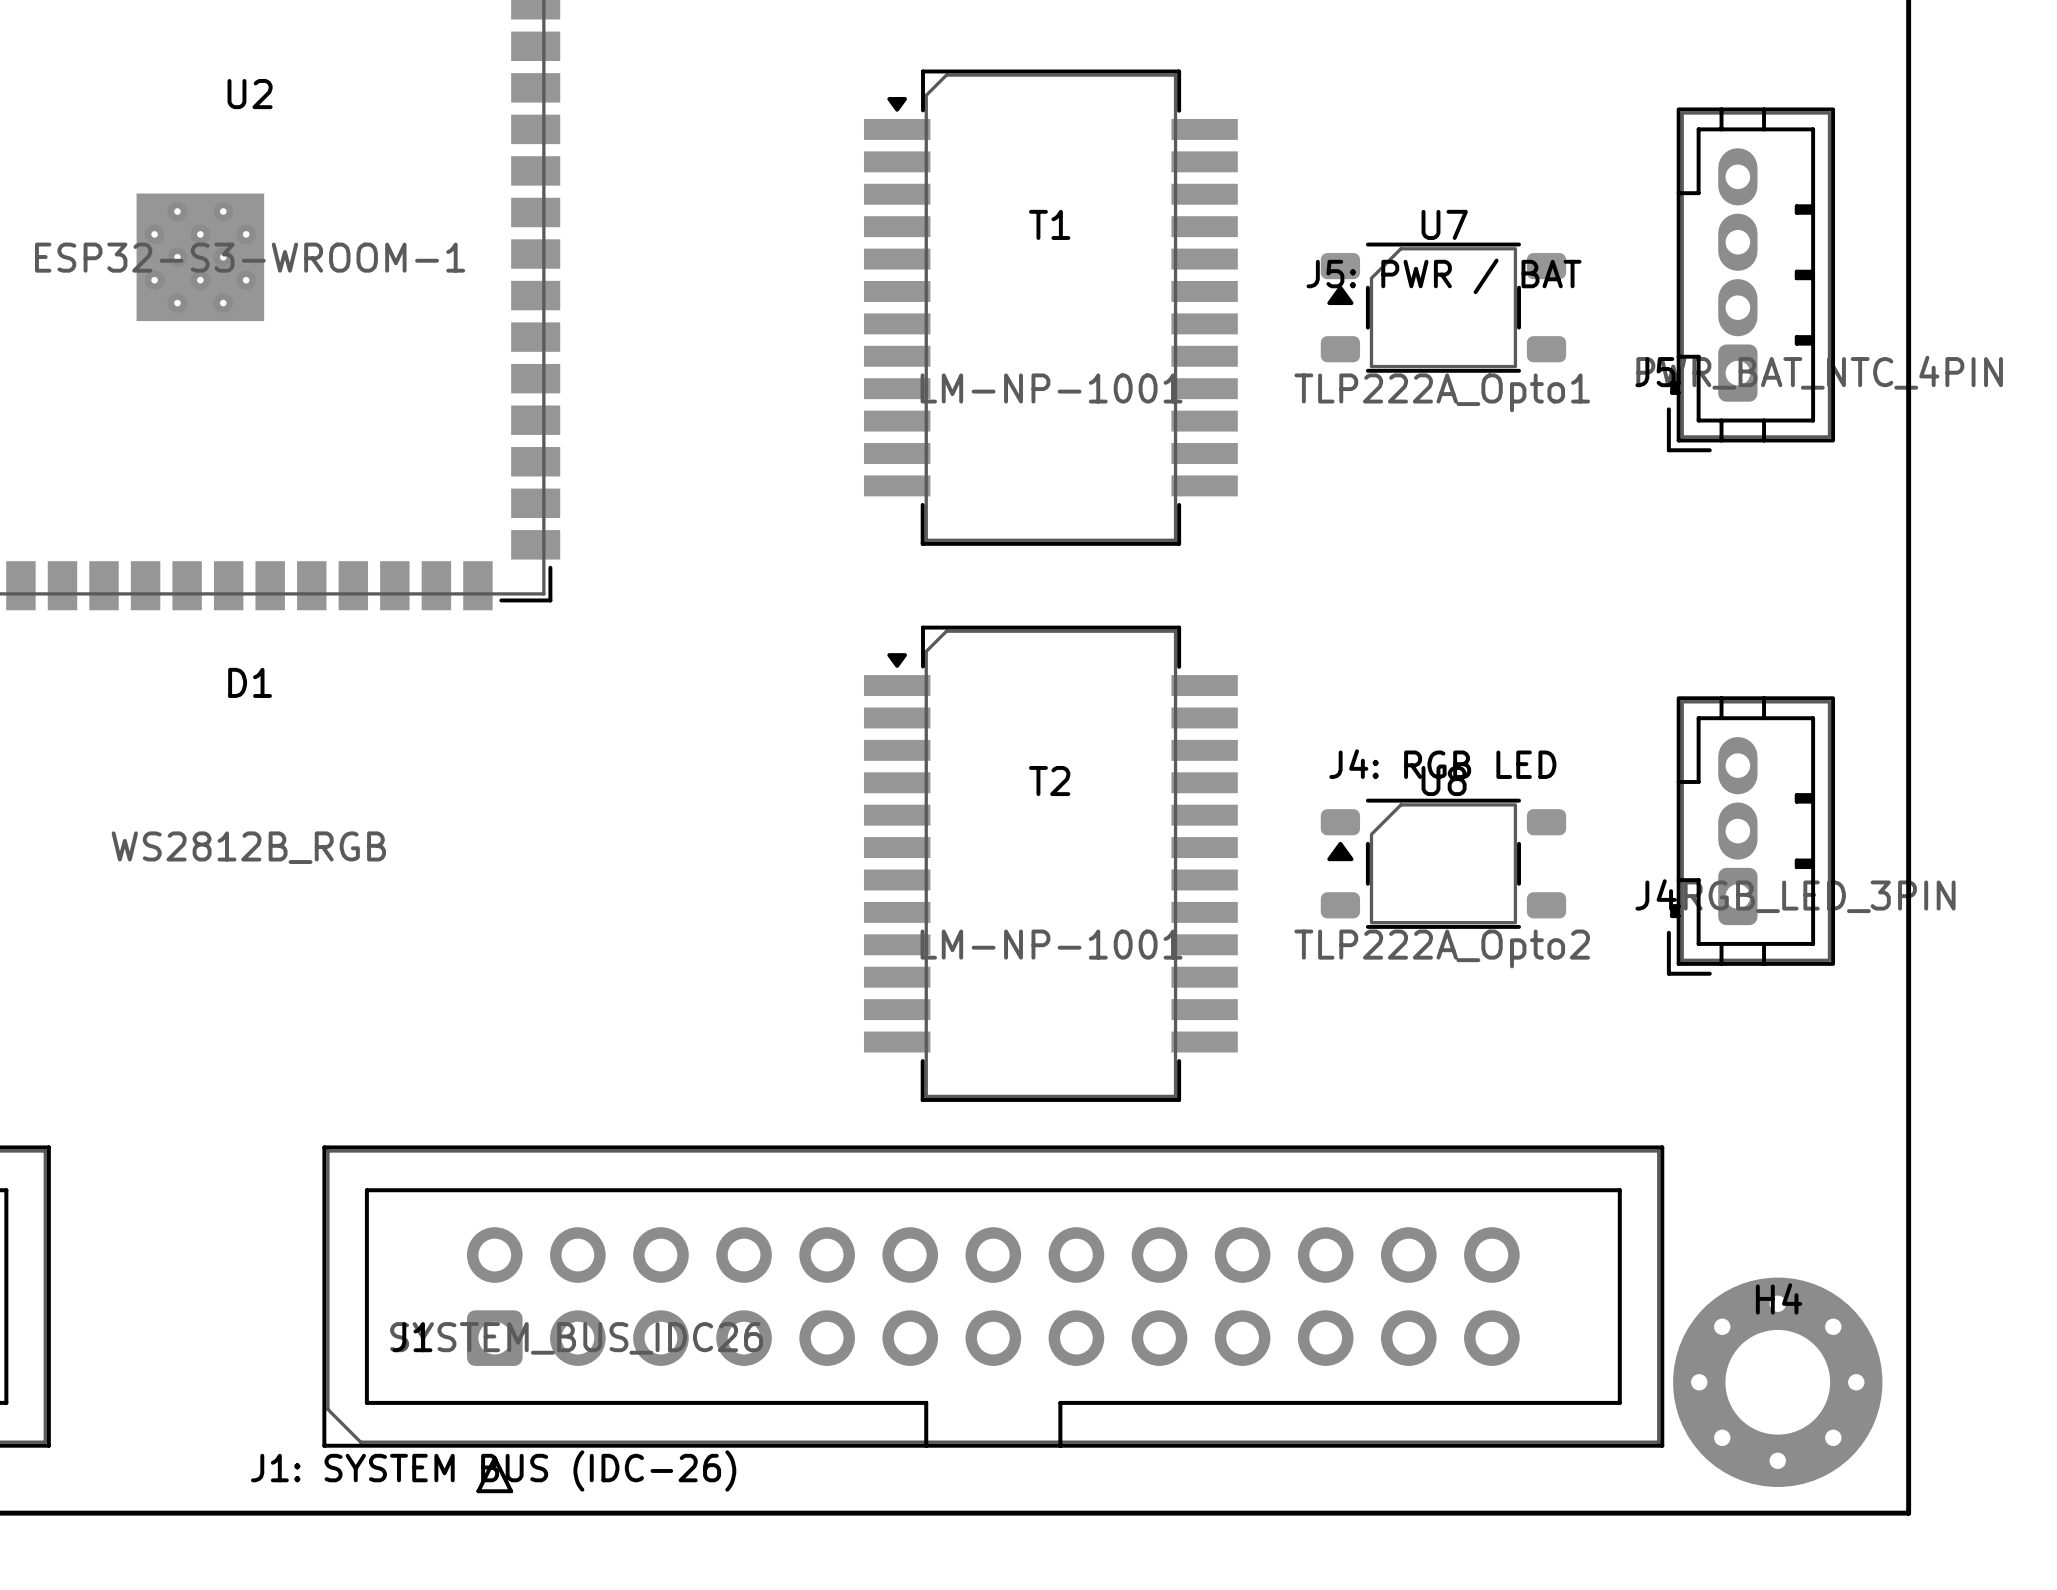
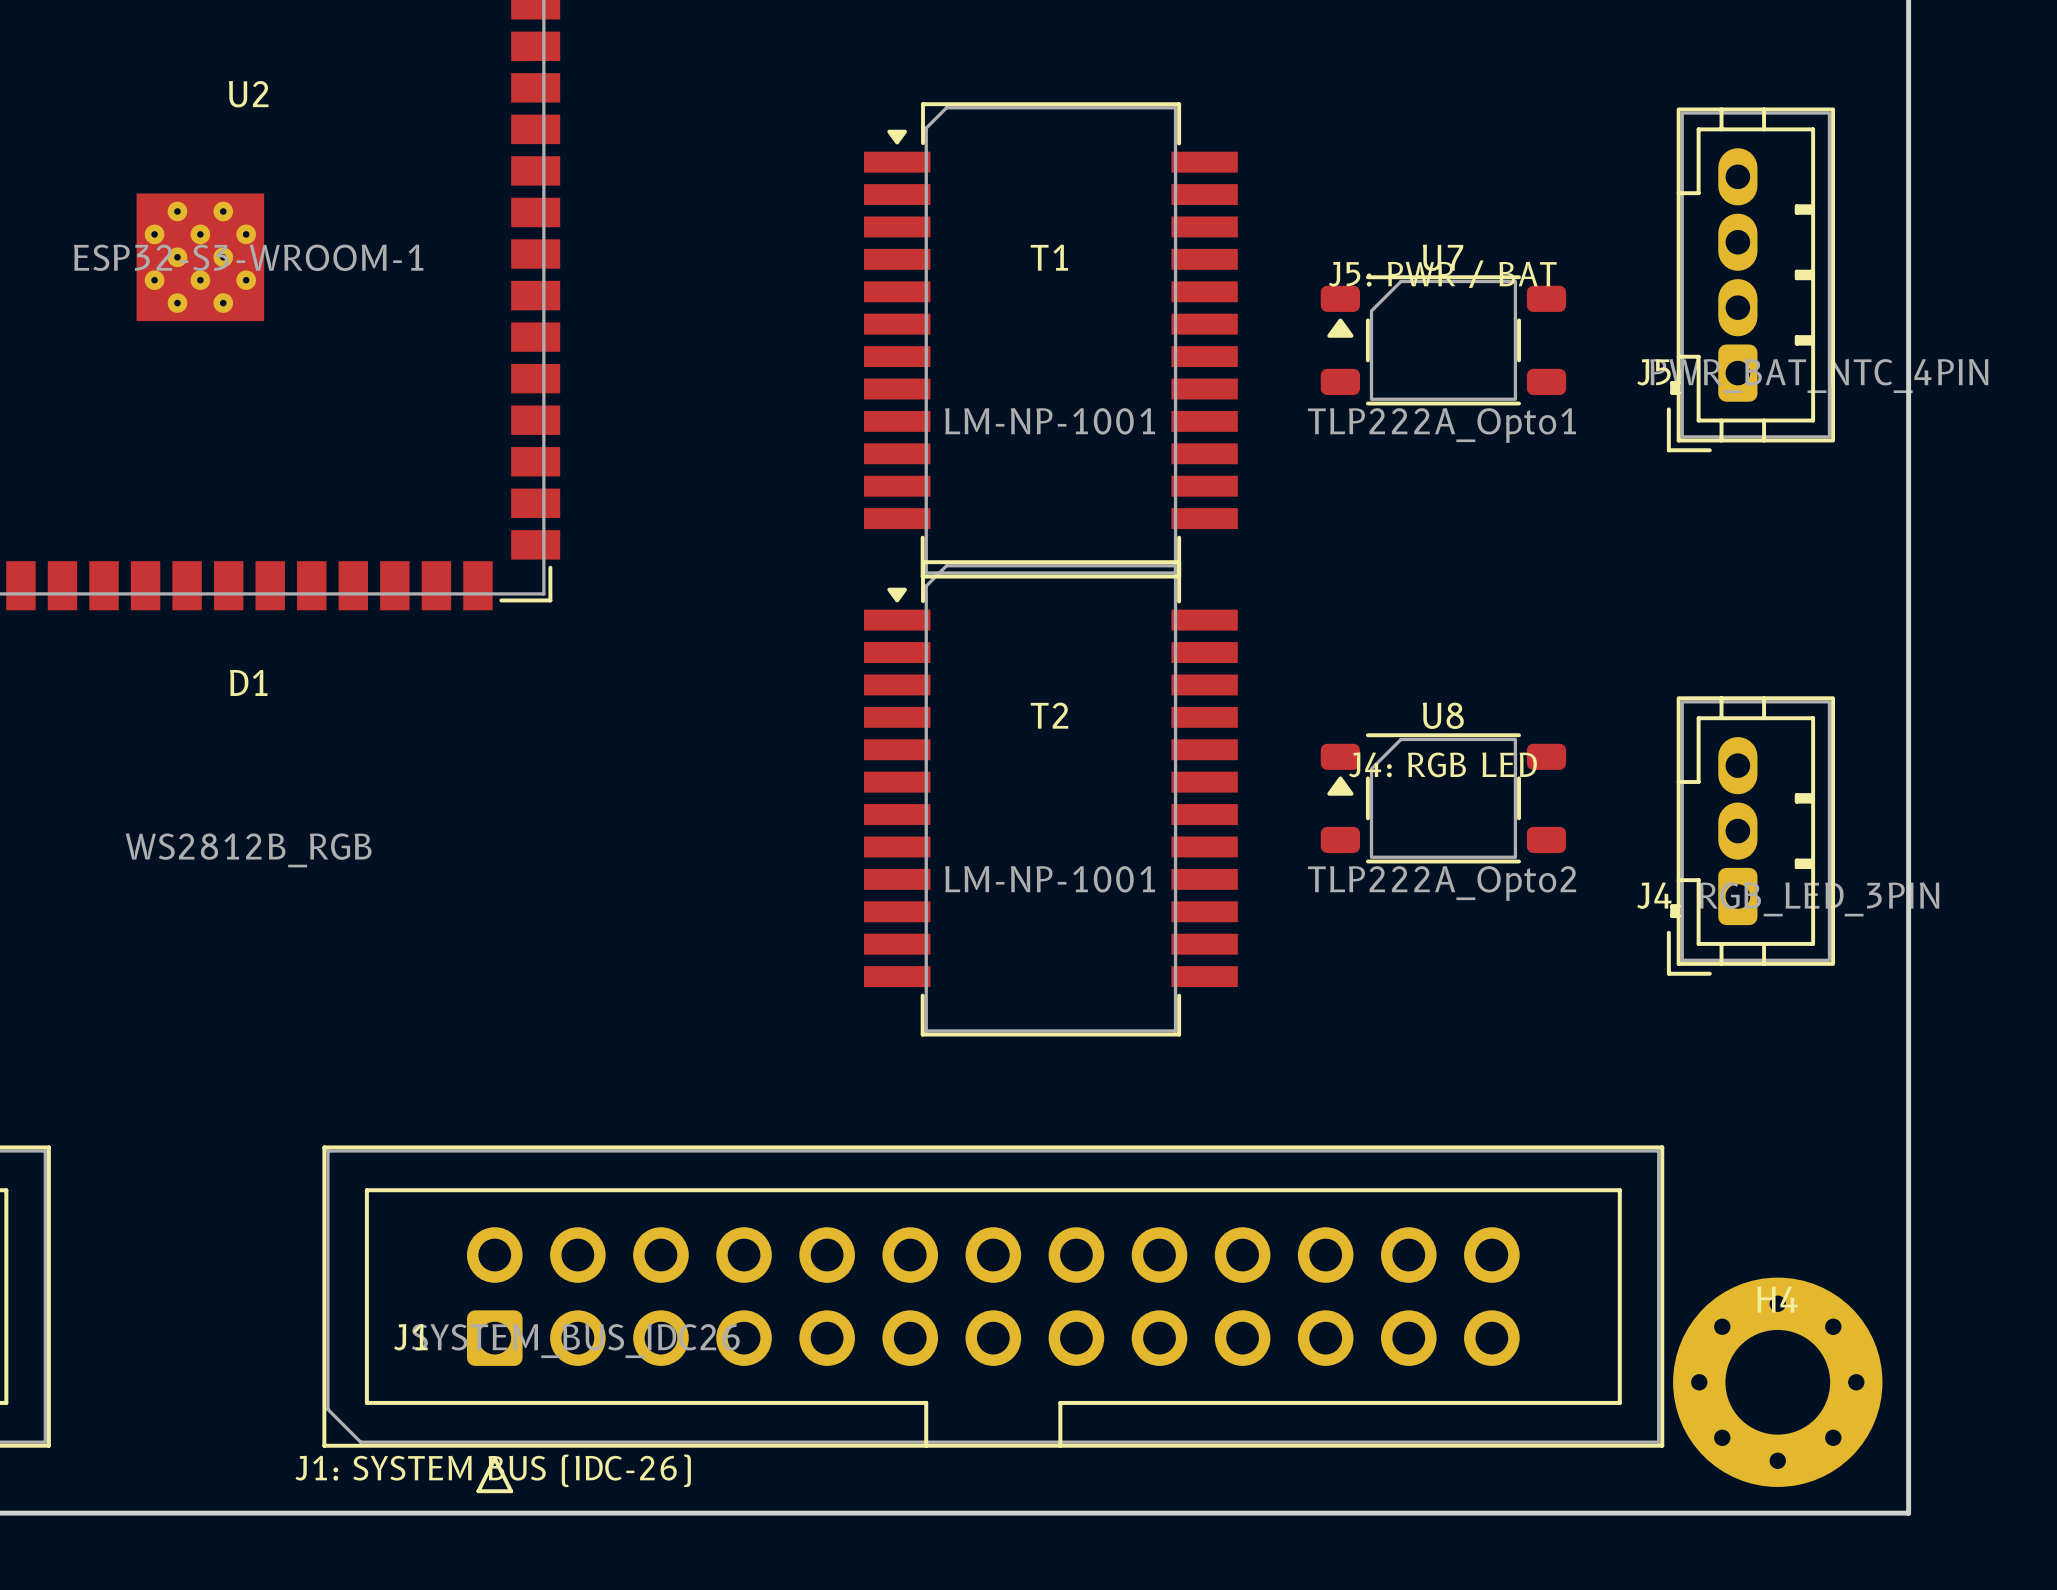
T1 position: (1050, 307) -> (1050, 340)
U7 position: (1443, 307) -> (1443, 340)
T2 position: (1050, 863) -> (1050, 798)
U8 position: (1443, 863) -> (1443, 798)

